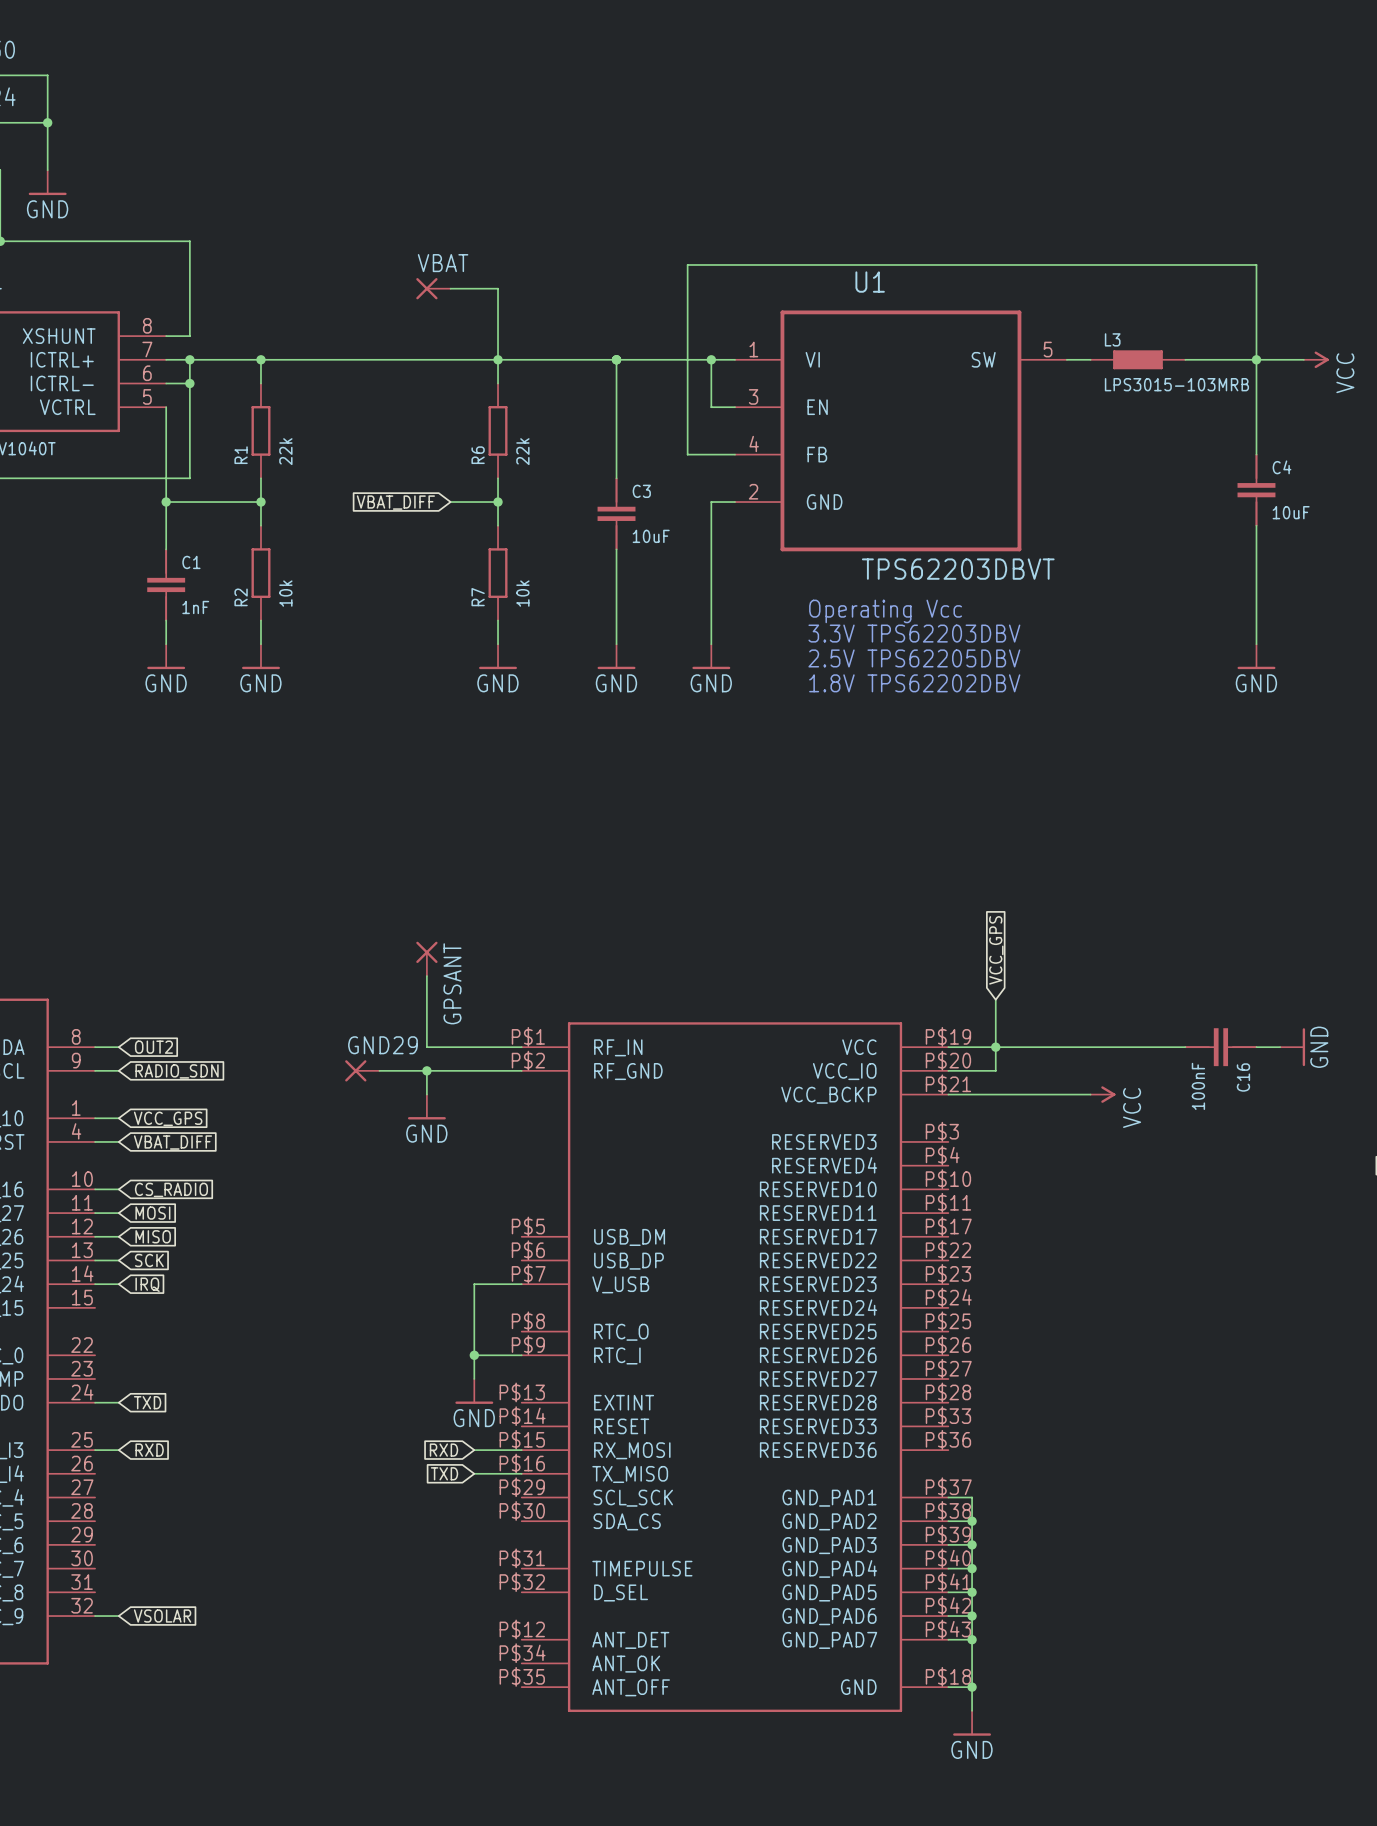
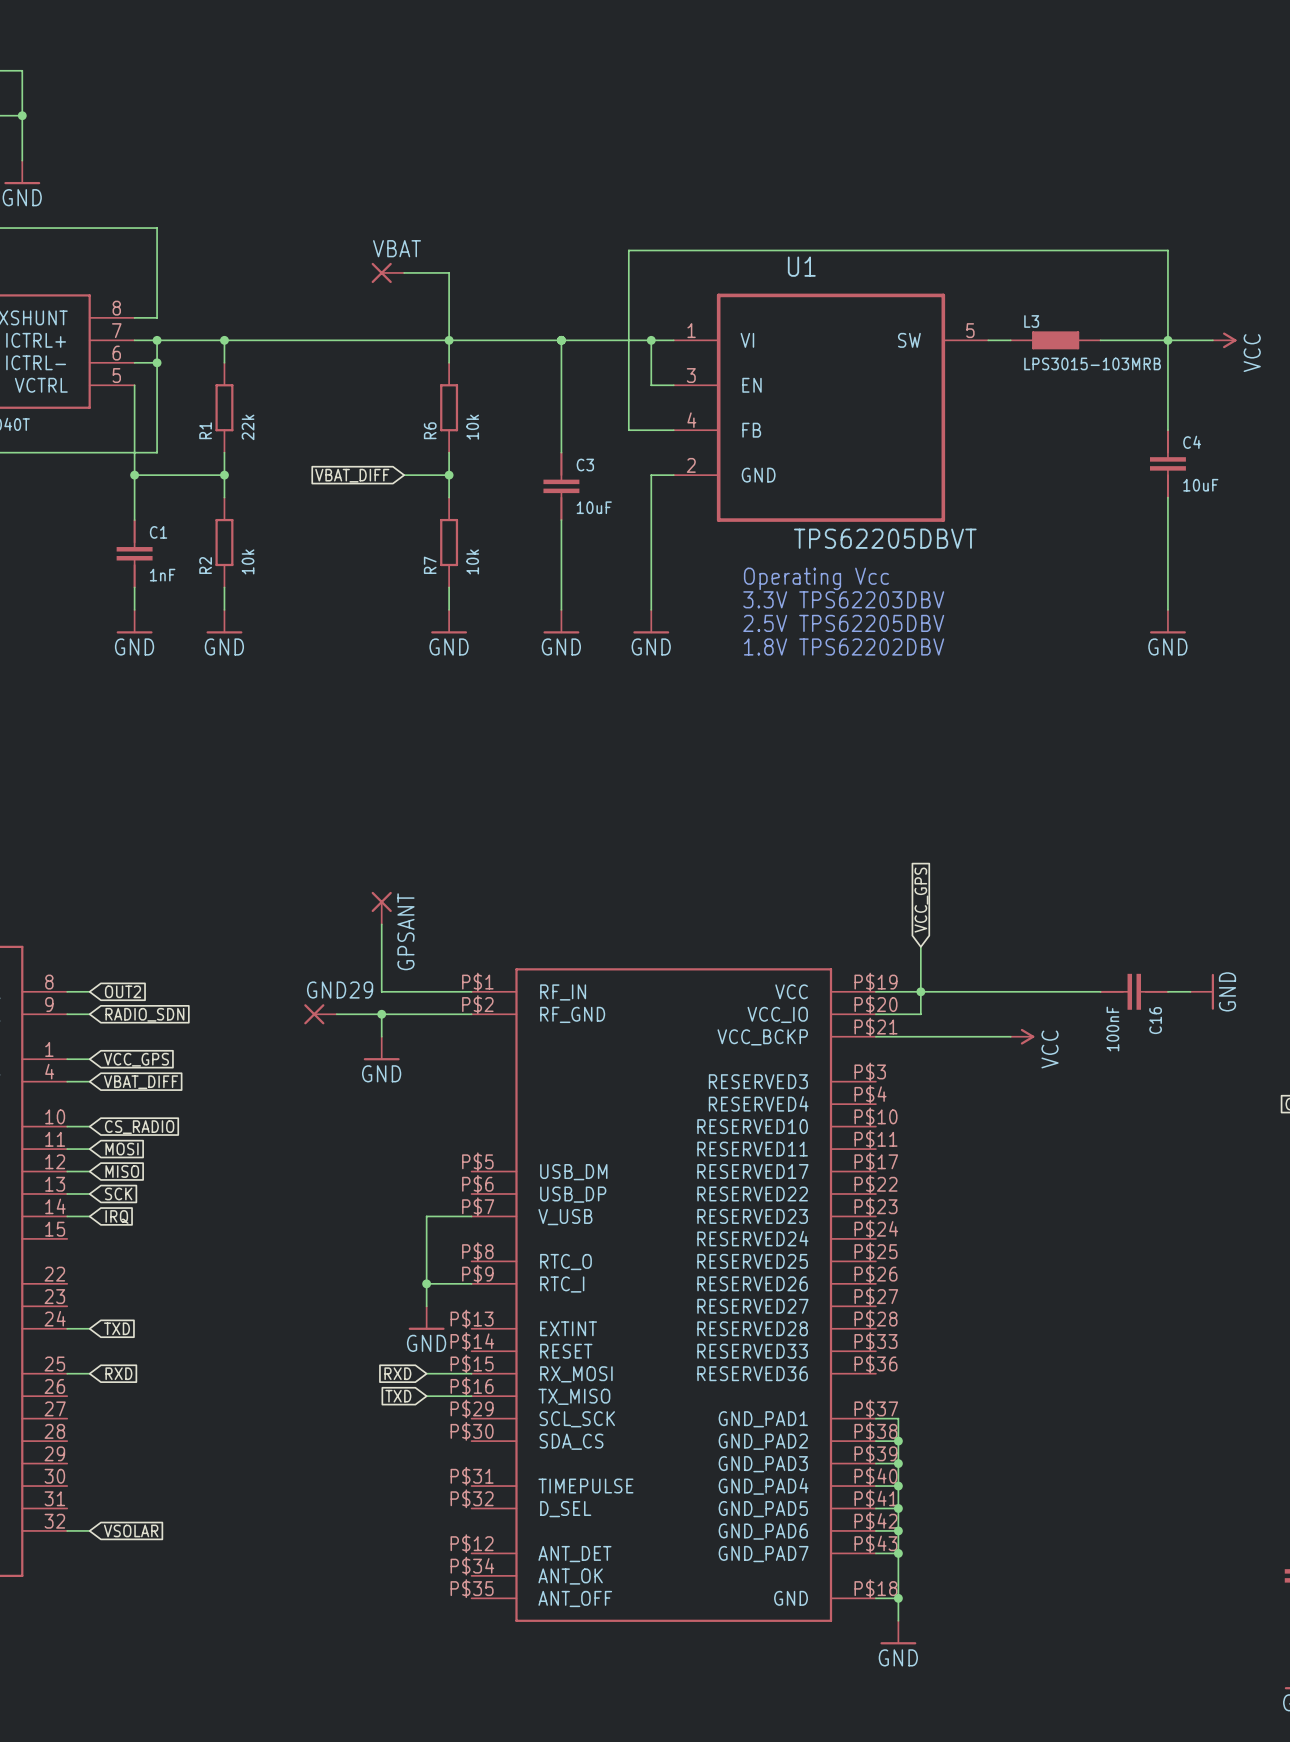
R6 value: 22k (522, 451) -> 10k (472, 427)
U1 value: TPS62203DBVT (958, 569) -> TPS62205DBVT (885, 538)

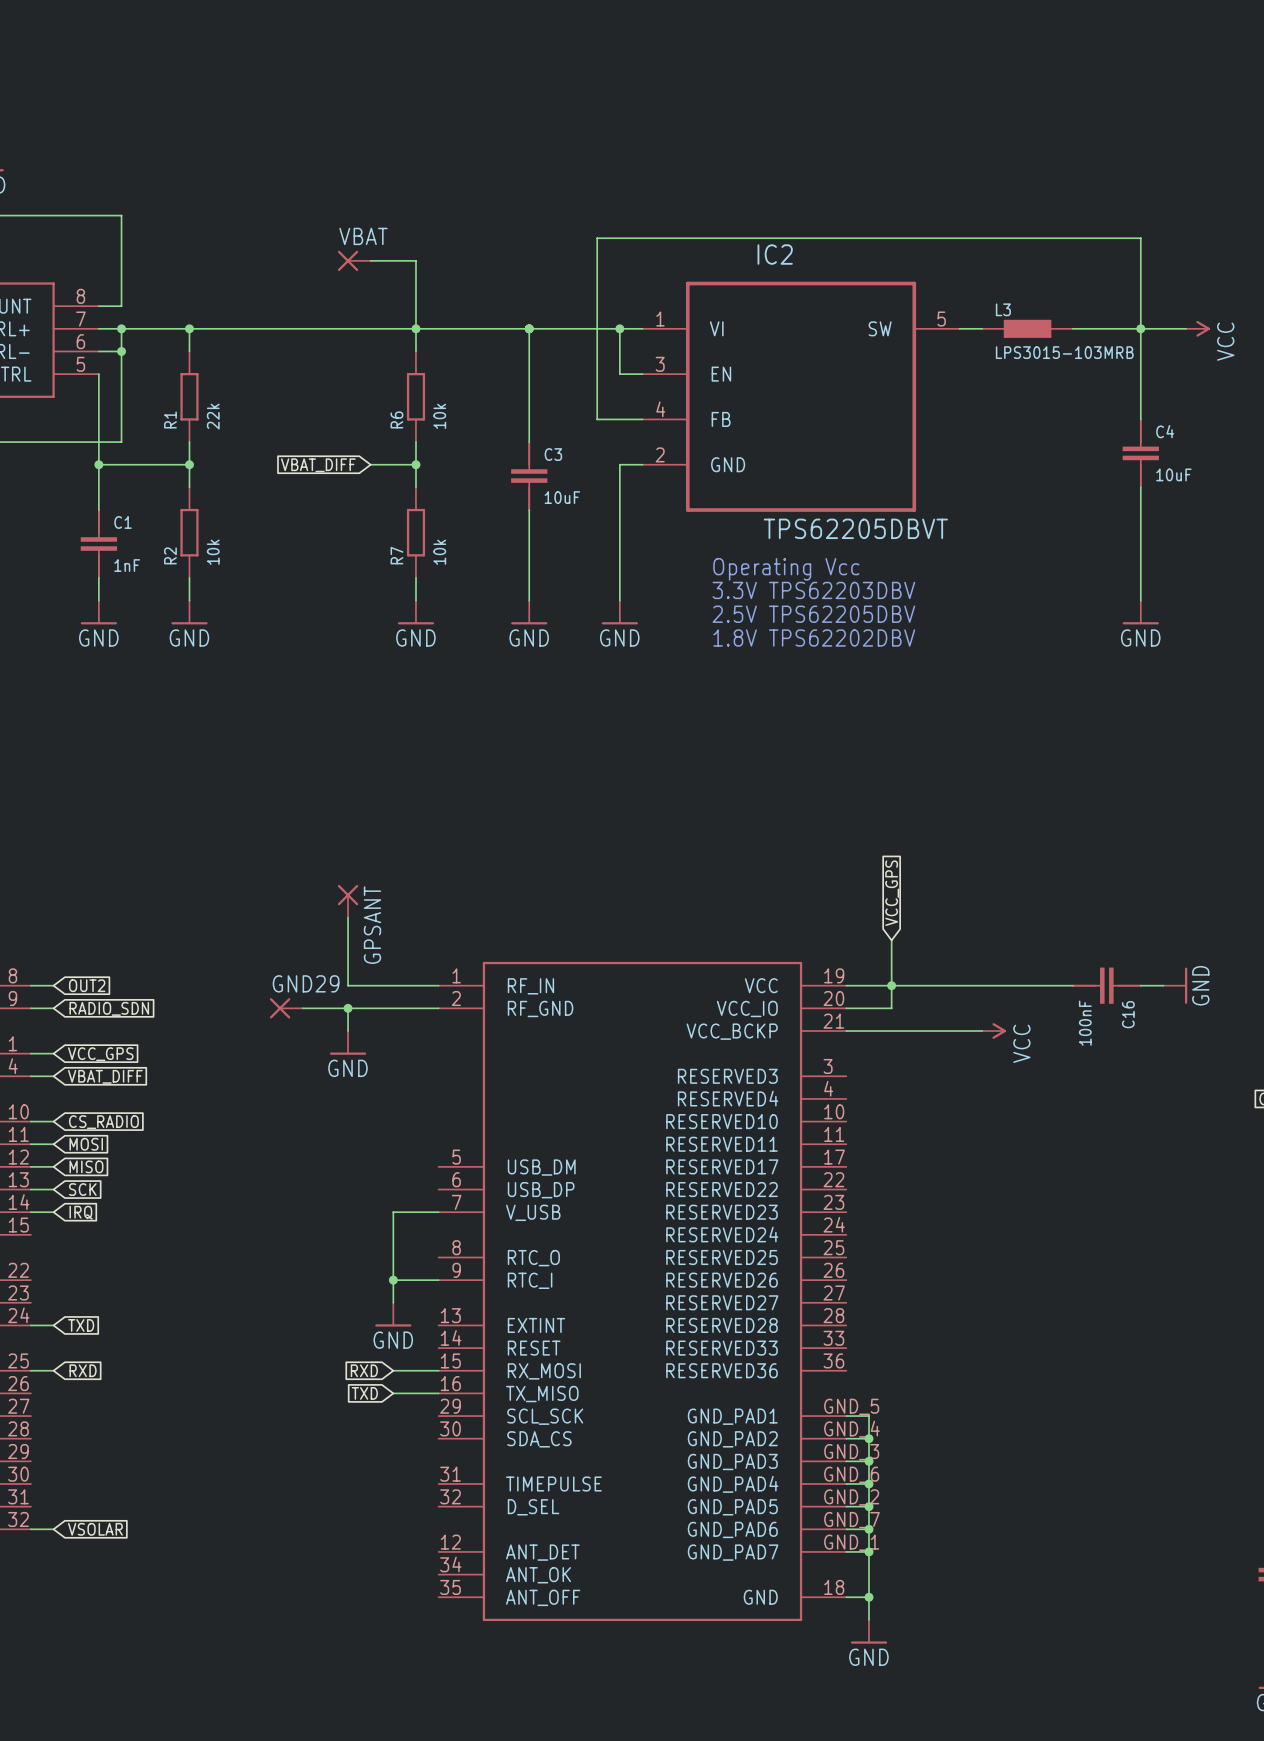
U1 name: U1 (801, 266) -> IC2 (775, 254)
part symbol: [471, 968, 876, 1622] -> [438, 961, 847, 1622]

